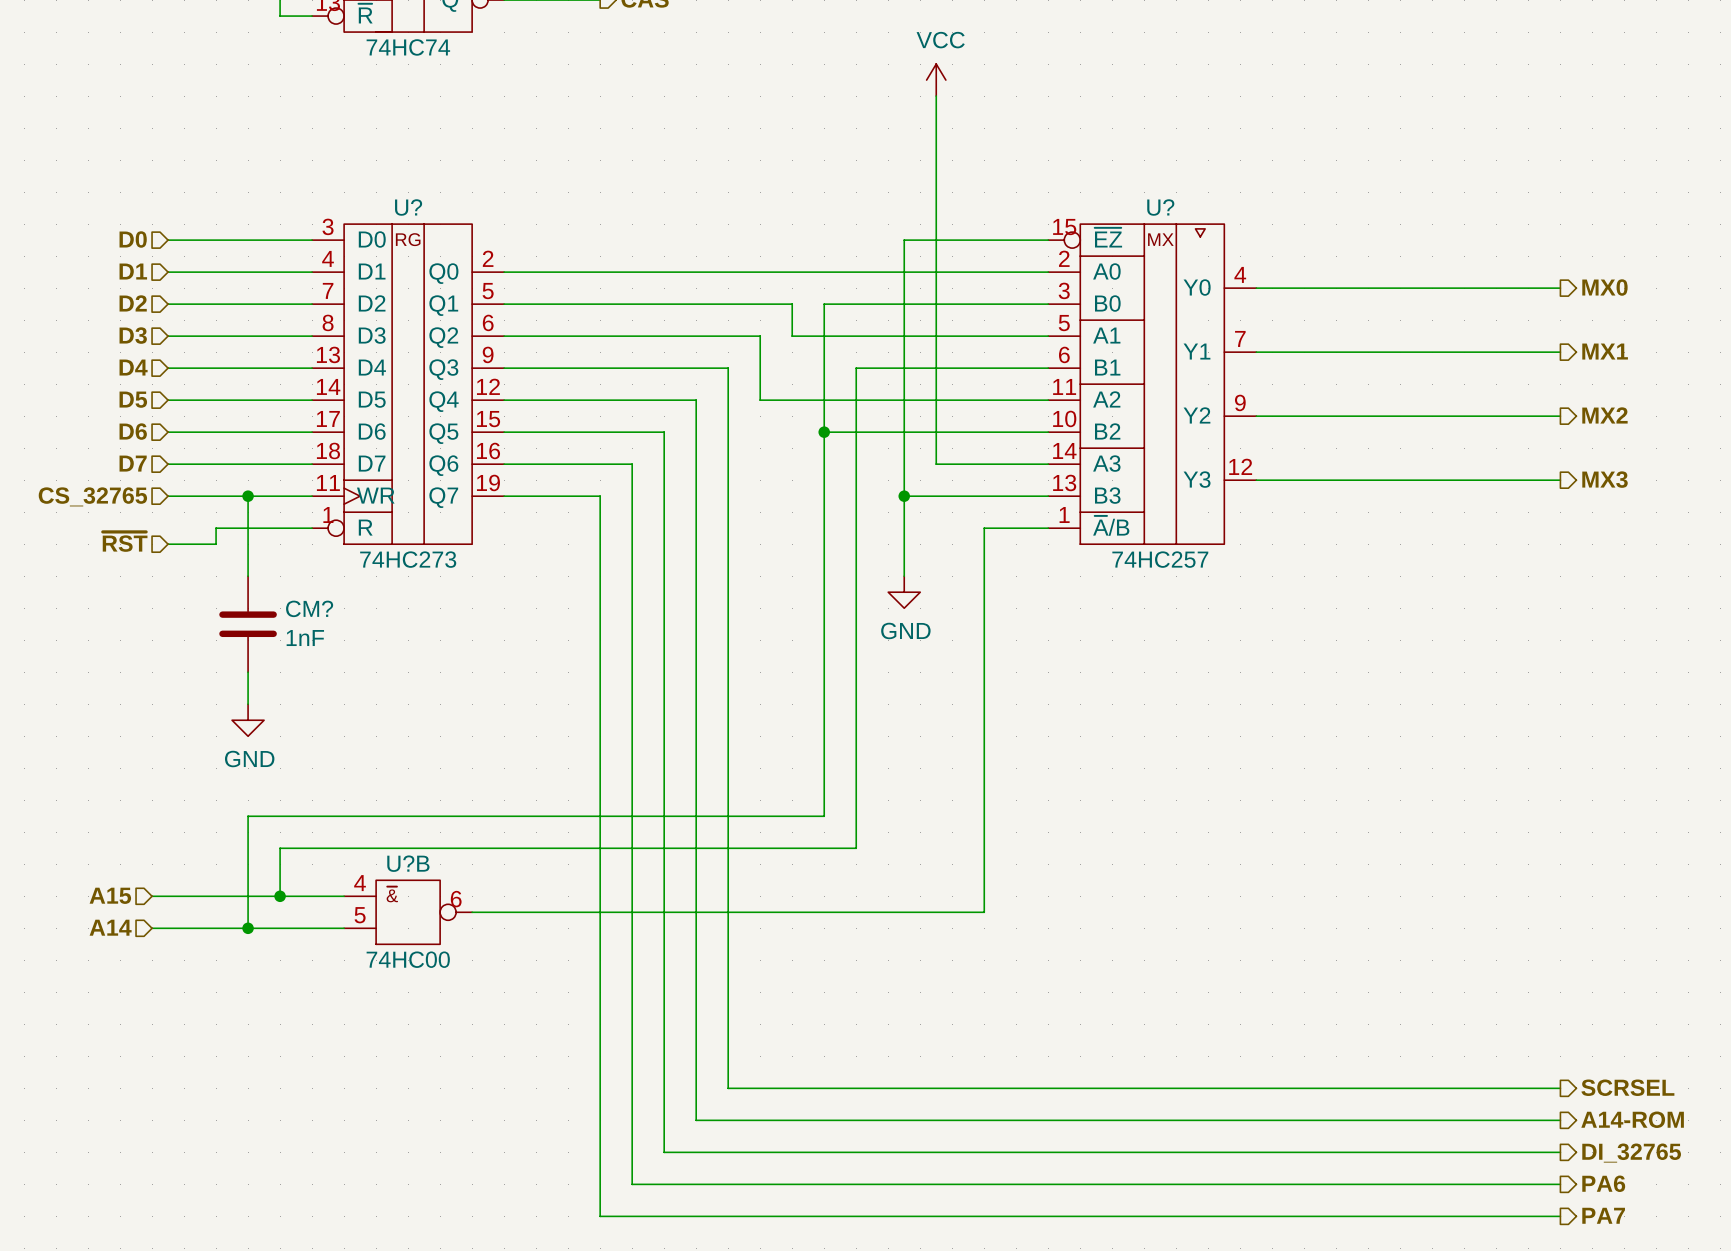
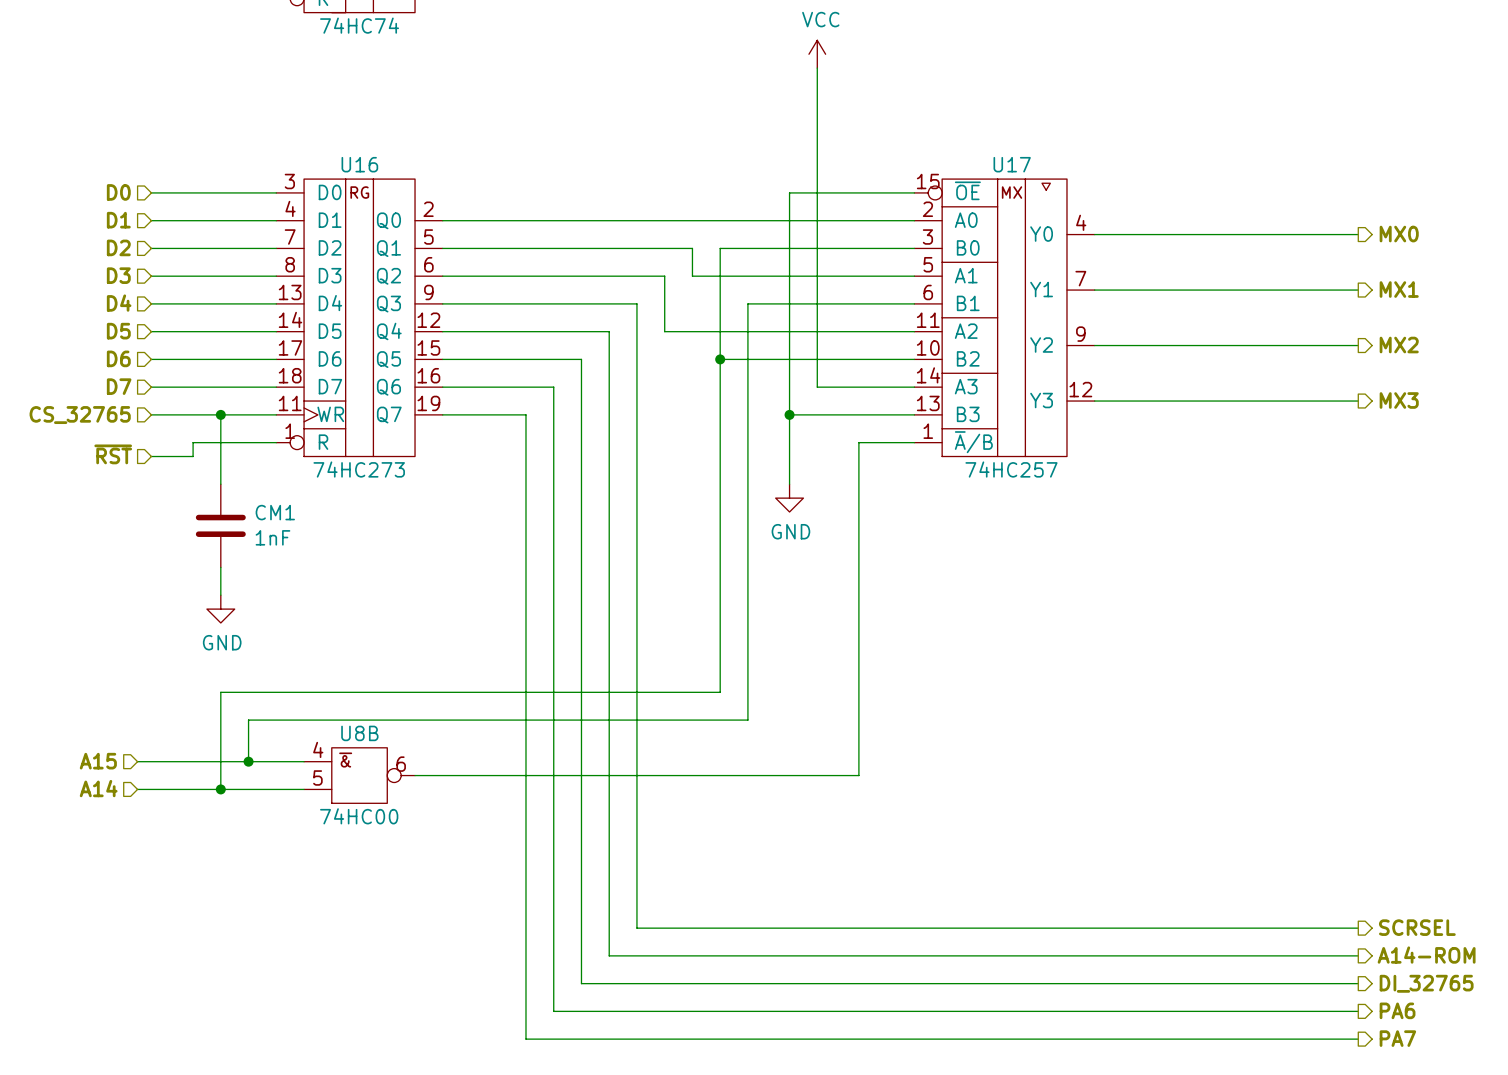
U? name: U? (408, 207) -> U16 (359, 164)
U? name: U? (1160, 207) -> U17 (1012, 164)
U? pin name: ~{EZ} (1108, 237) -> ~{OE} (967, 190)
CM? name: CM? (309, 608) -> CM1 (275, 512)
U?B name: U?B (408, 863) -> U8B (359, 733)

